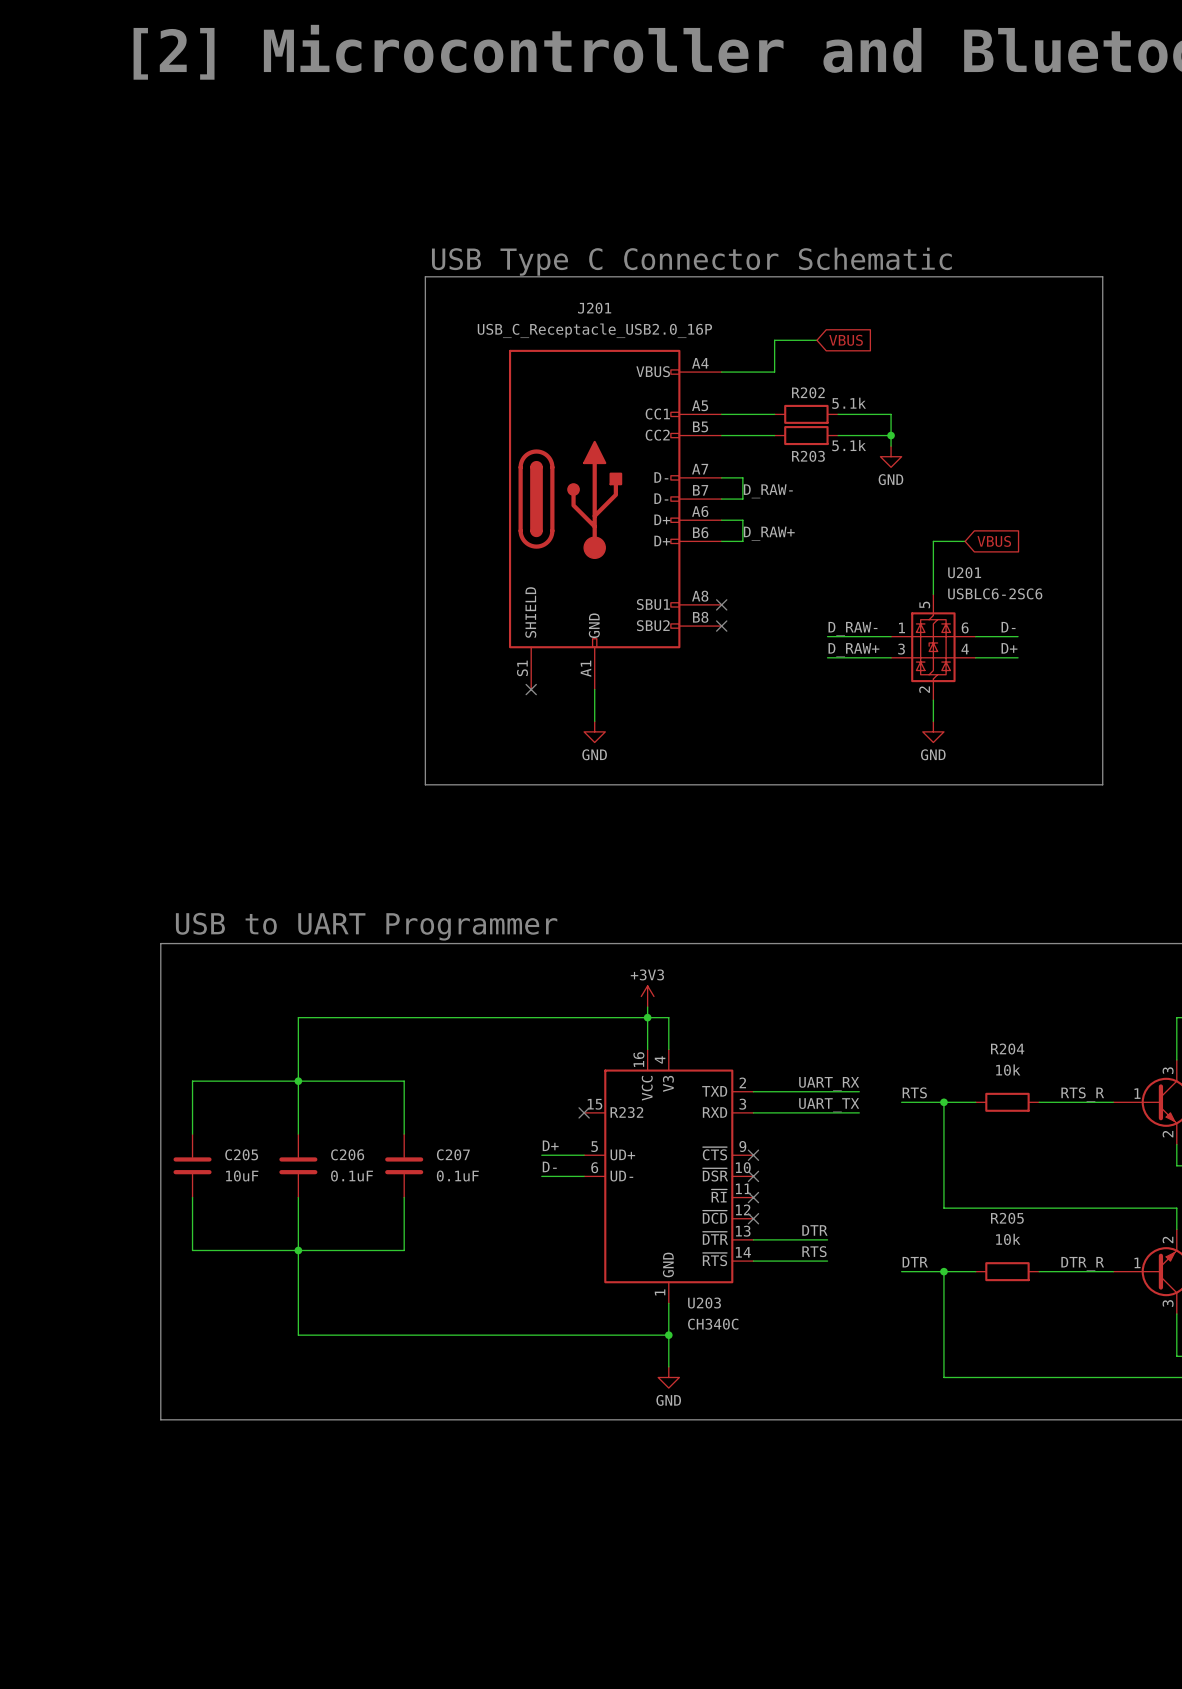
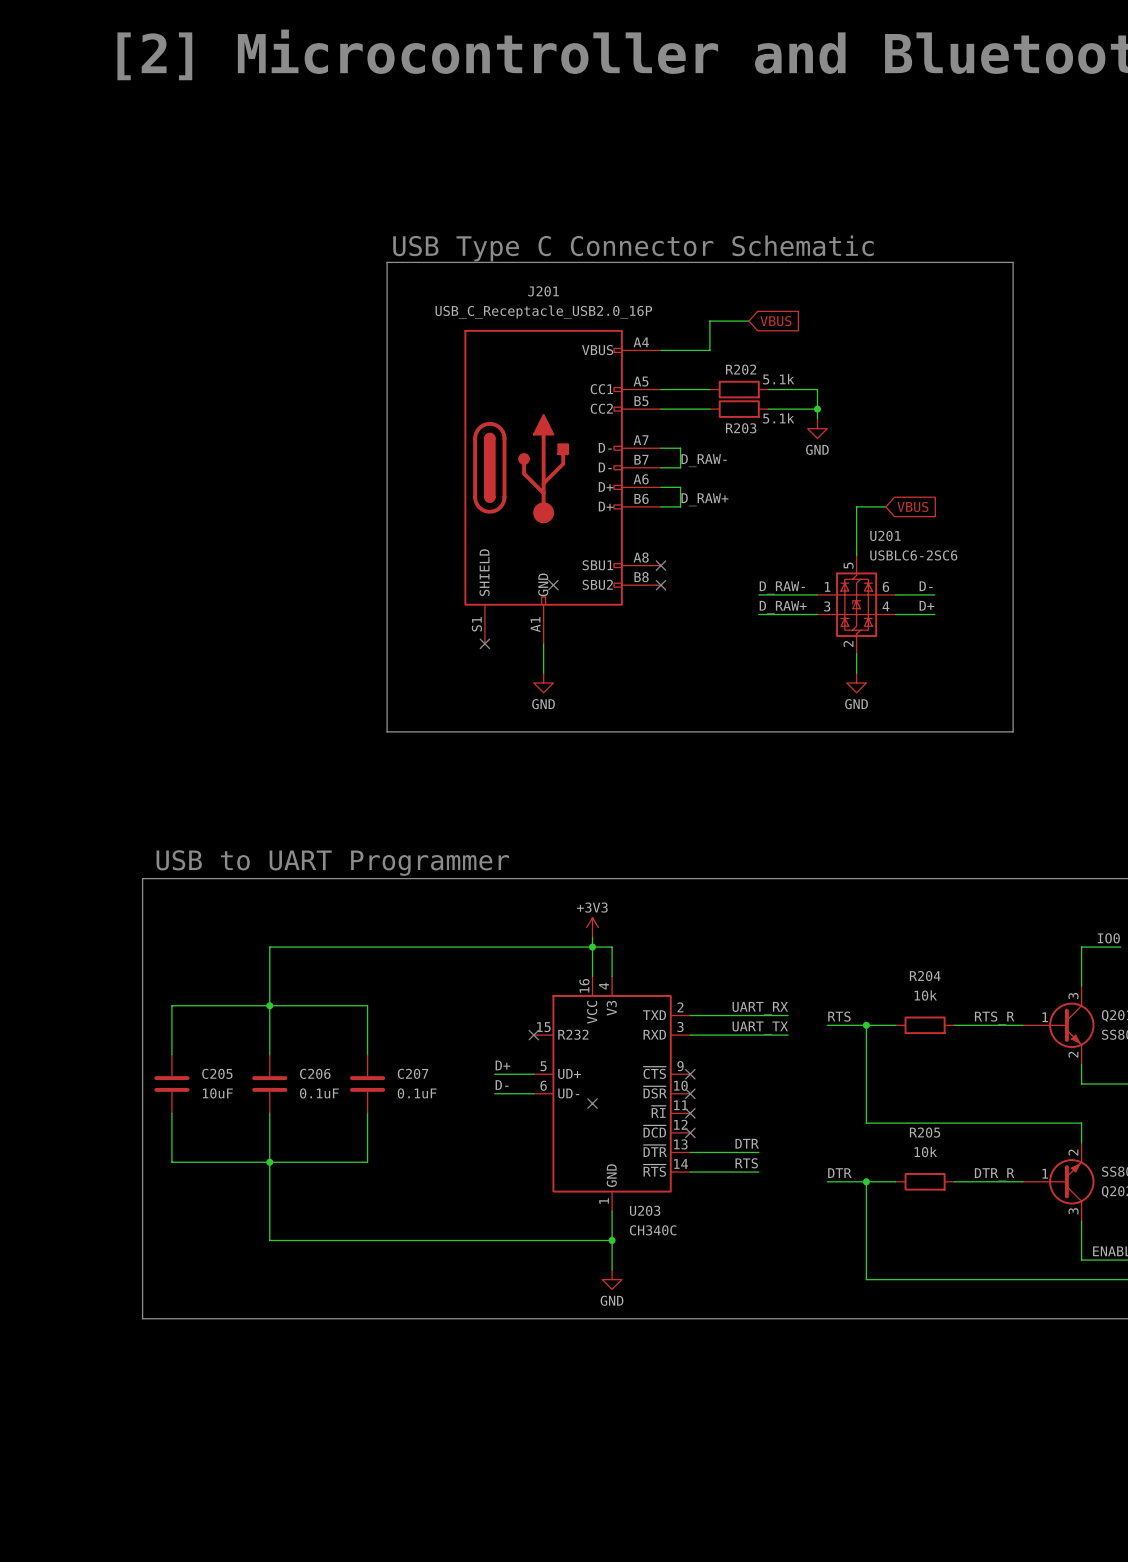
no-connect mark: none -> (553, 585)
no-connect mark: none -> (592, 1103)

